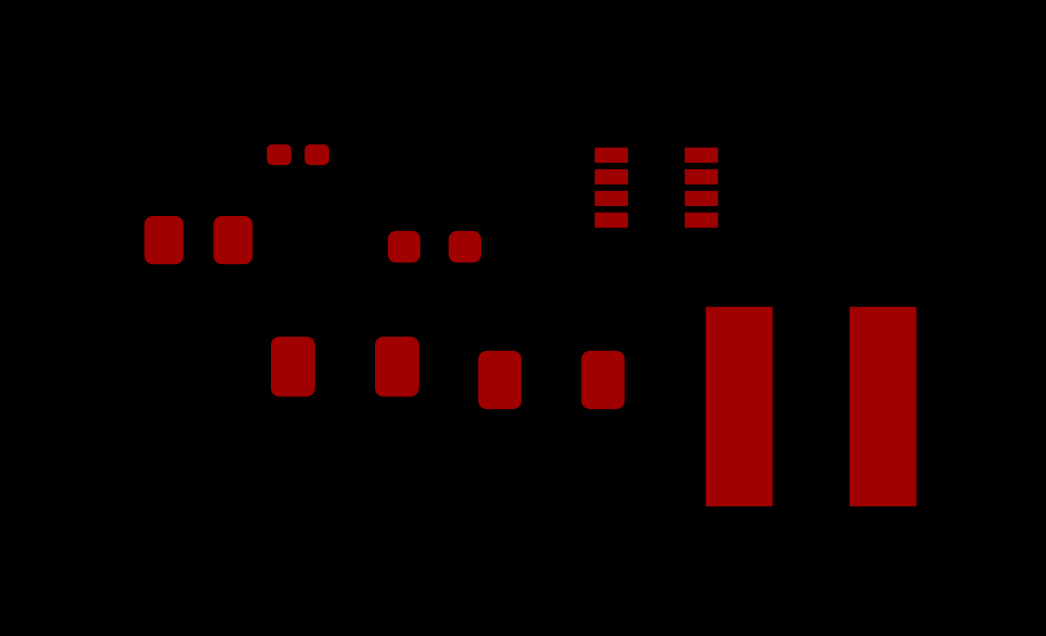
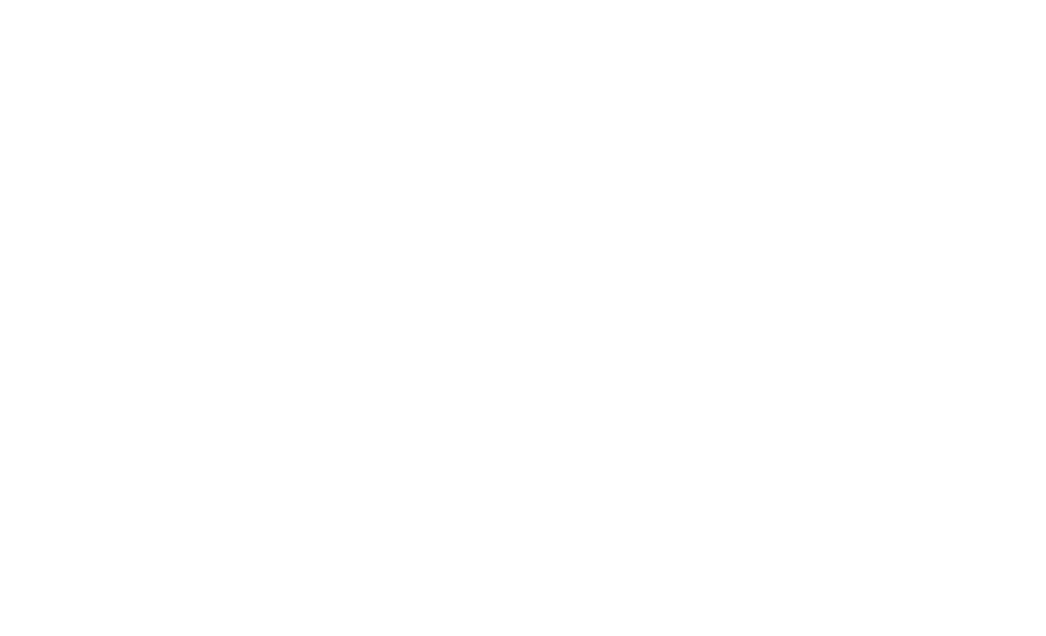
part: (297, 154) -> none
part: (656, 187) -> none
part: (198, 240) -> none
part: (434, 246) -> none
part: (344, 366) -> none
part: (551, 379) -> none
part: (811, 406) -> none

